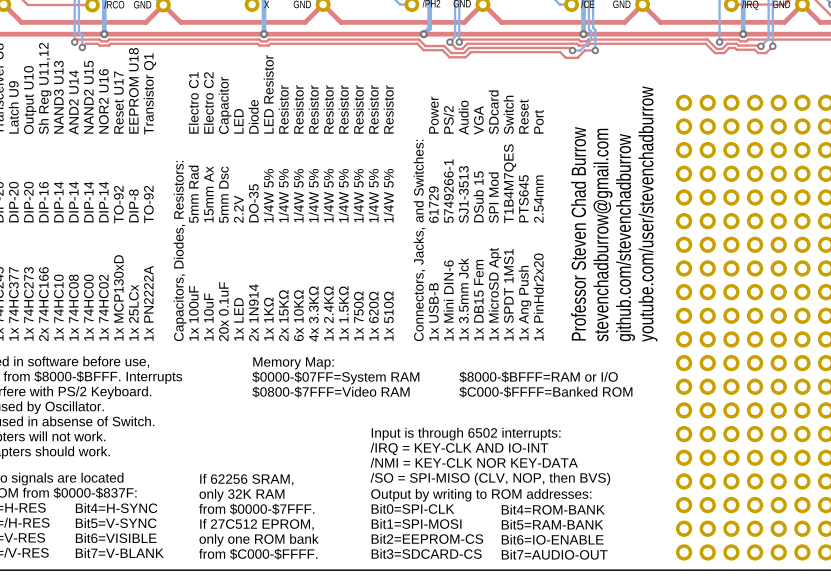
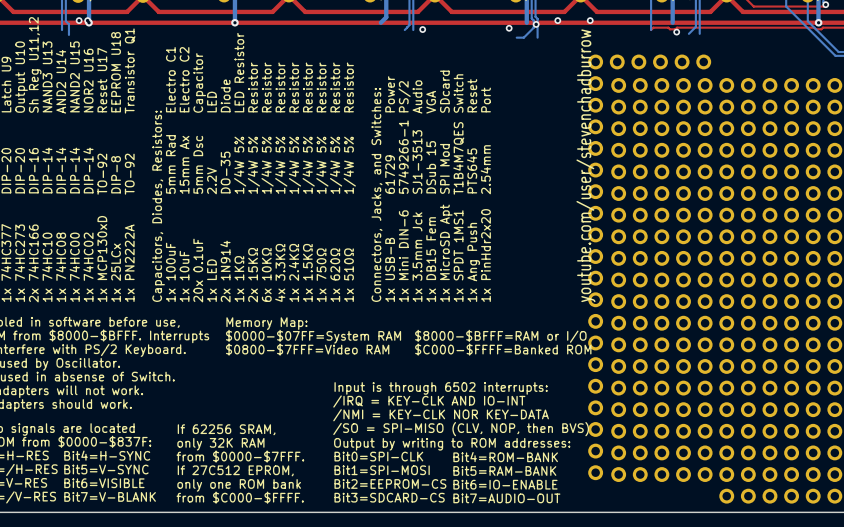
via: none -> (79, 20)
via: none -> (87, 20)
via: none -> (557, 20)
via: none -> (590, 20)
via: (423, 34) -> none
via: (583, 34) -> none
via: (743, 34) -> none
via: none -> (536, 24)
via: none -> (509, 28)
via: none -> (422, 29)
top track: (74, 42) (77, 39) (99, 39) (101, 41) (109, 39) (259, 39) (261, 41) (268, 39) (419, 39) (425, 46) (444, 46) (451, 53) (464, 53) (469, 47) (569, 47) (572, 50) -> none
via: (74, 42) -> none
top track: (449, 42) (456, 48) (462, 48) (467, 43) (577, 43) (578, 45) (589, 43) (705, 43) (715, 53) (724, 53) (729, 47) (754, 49) (758, 53) (766, 53) (772, 46) -> none
via: (449, 42) -> none
top track: (459, 42) (461, 39) (578, 39) (580, 41) (588, 39) (707, 39) (716, 48) (722, 48) (727, 43) (760, 46) -> none
via: (459, 42) -> none
via: (719, 42) -> none
via: none -> (676, 32)
via: (760, 46) -> none
via: (772, 46) -> none
top track: (82, 47) (86, 43) (97, 43) (99, 45) (110, 43) (257, 43) (259, 45) (270, 43) (417, 43) (423, 50) (442, 50) (449, 57) (465, 57) (470, 52) (560, 52) (565, 57) (577, 57) (584, 50) (595, 50) -> none
via: (82, 47) -> none
via: (572, 50) -> none
via: (595, 50) -> none
part: none -> (595, 61)
part: none -> (617, 61)
part: none -> (638, 61)
part: none -> (660, 61)
part: none -> (682, 61)
part: none -> (703, 61)
part: none -> (595, 83)
part: none -> (595, 105)
part: none -> (595, 126)
part: none -> (595, 148)
part: none -> (595, 170)
part: none -> (595, 191)
text: Professor Steven Chad Burrow (578, 233) -> none
text: stevenchadburrow@gmail.com (603, 235) -> none
text: github.com/stevenchadburrow (625, 237) -> none
part: none -> (595, 213)
part: none -> (595, 234)
part: none -> (595, 256)
part: none -> (595, 278)
part: none -> (595, 299)
part: none -> (595, 321)
part: none -> (595, 343)
part: none -> (595, 364)
part: none -> (595, 386)
part: none -> (595, 407)
part: none -> (595, 429)
part: none -> (595, 451)
part: none -> (595, 472)
part: (684, 552) -> none
part: (707, 552) -> none
part: (731, 552) -> none
part: (755, 552) -> none
part: (778, 552) -> none

